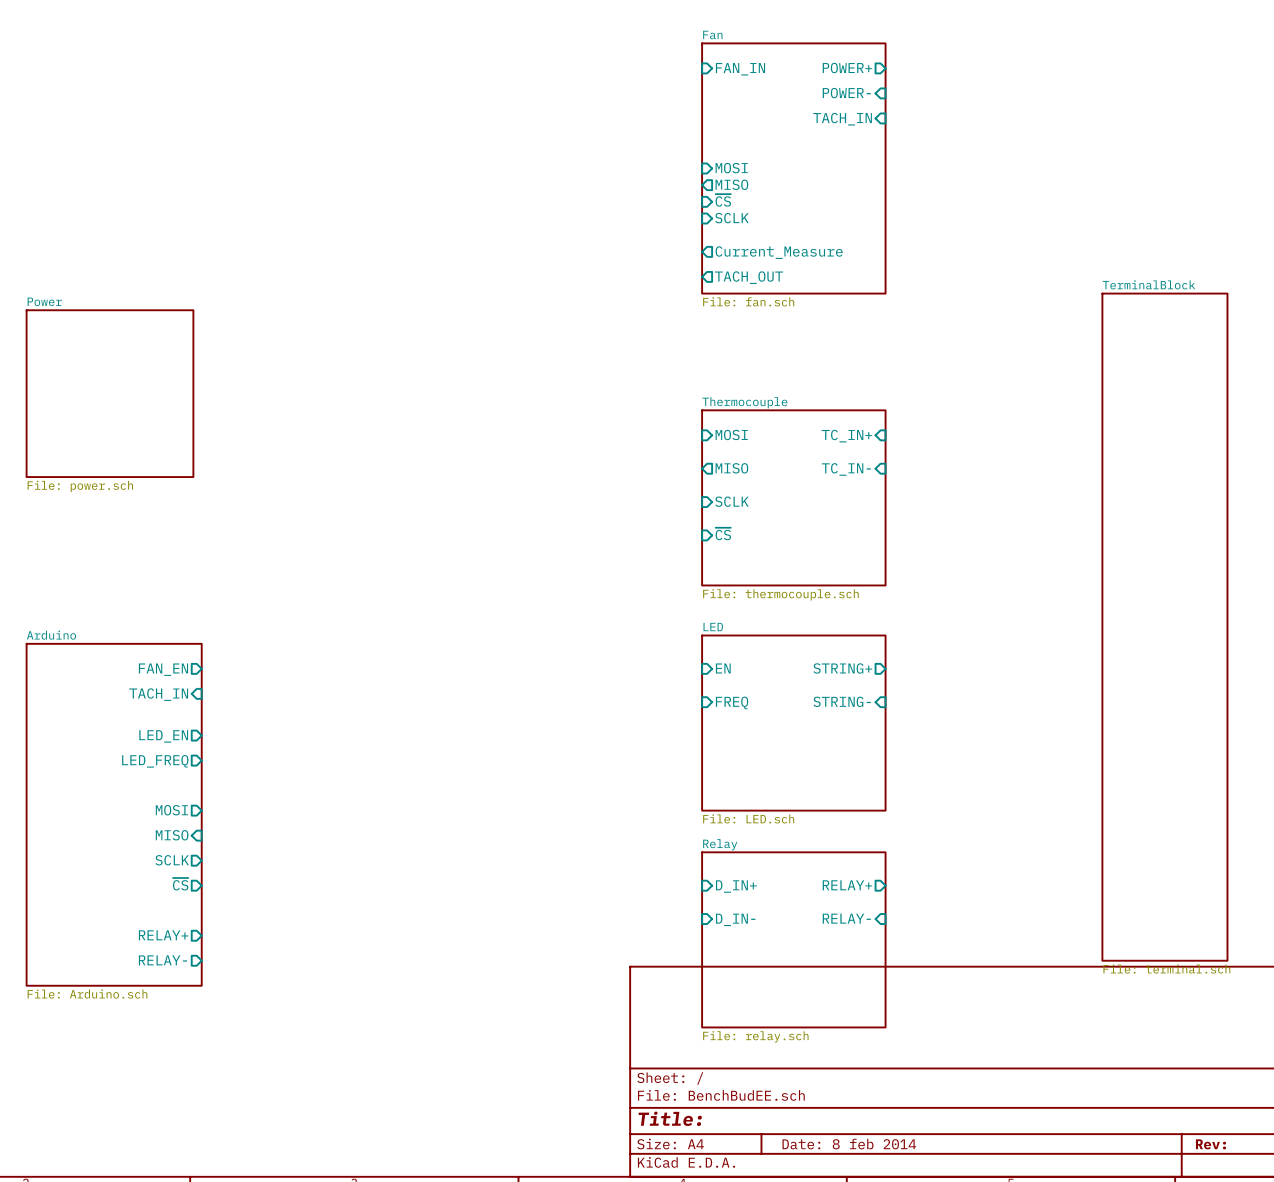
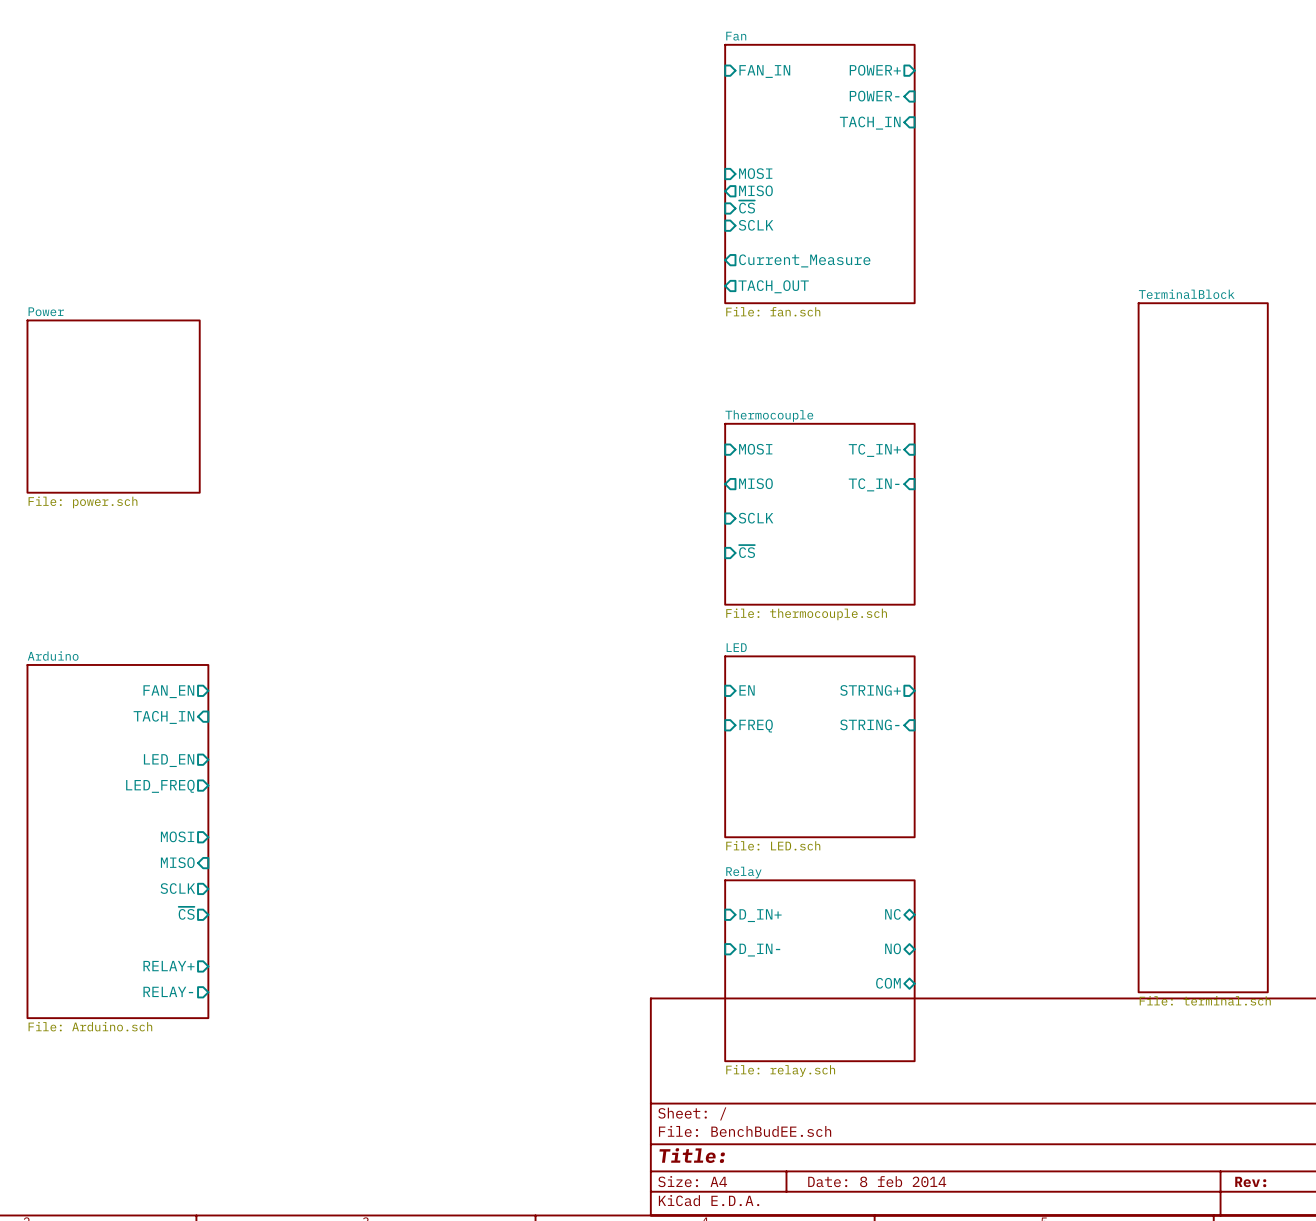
sheet pin shape: output (847, 885) -> bidirectional (892, 914)
sheet pin: RELAY+ (847, 885) -> NC (892, 914)
sheet pin shape: input (846, 918) -> bidirectional (893, 948)
sheet pin: RELAY- (846, 918) -> NO (893, 948)
sheet pin: none -> COM (888, 983)

